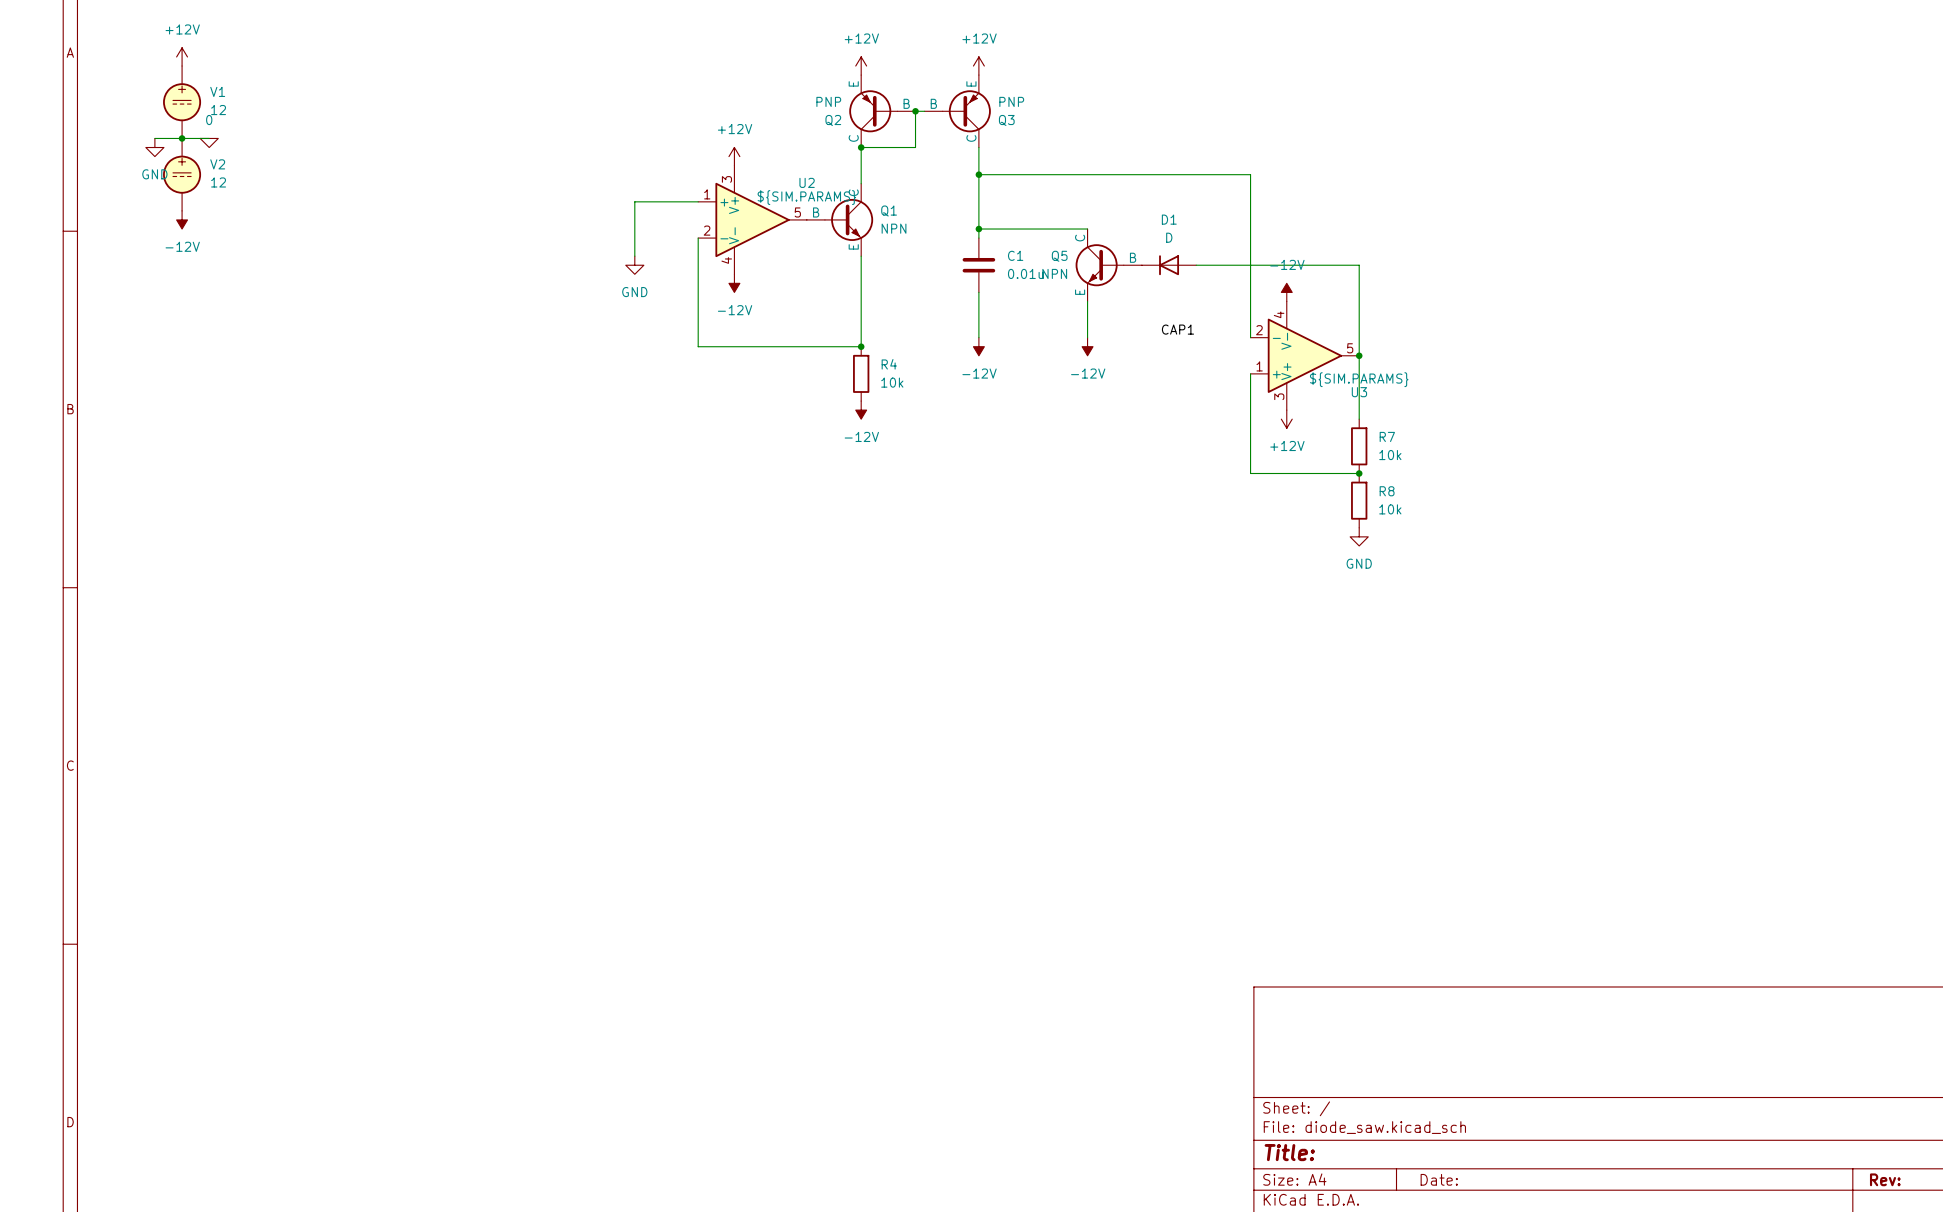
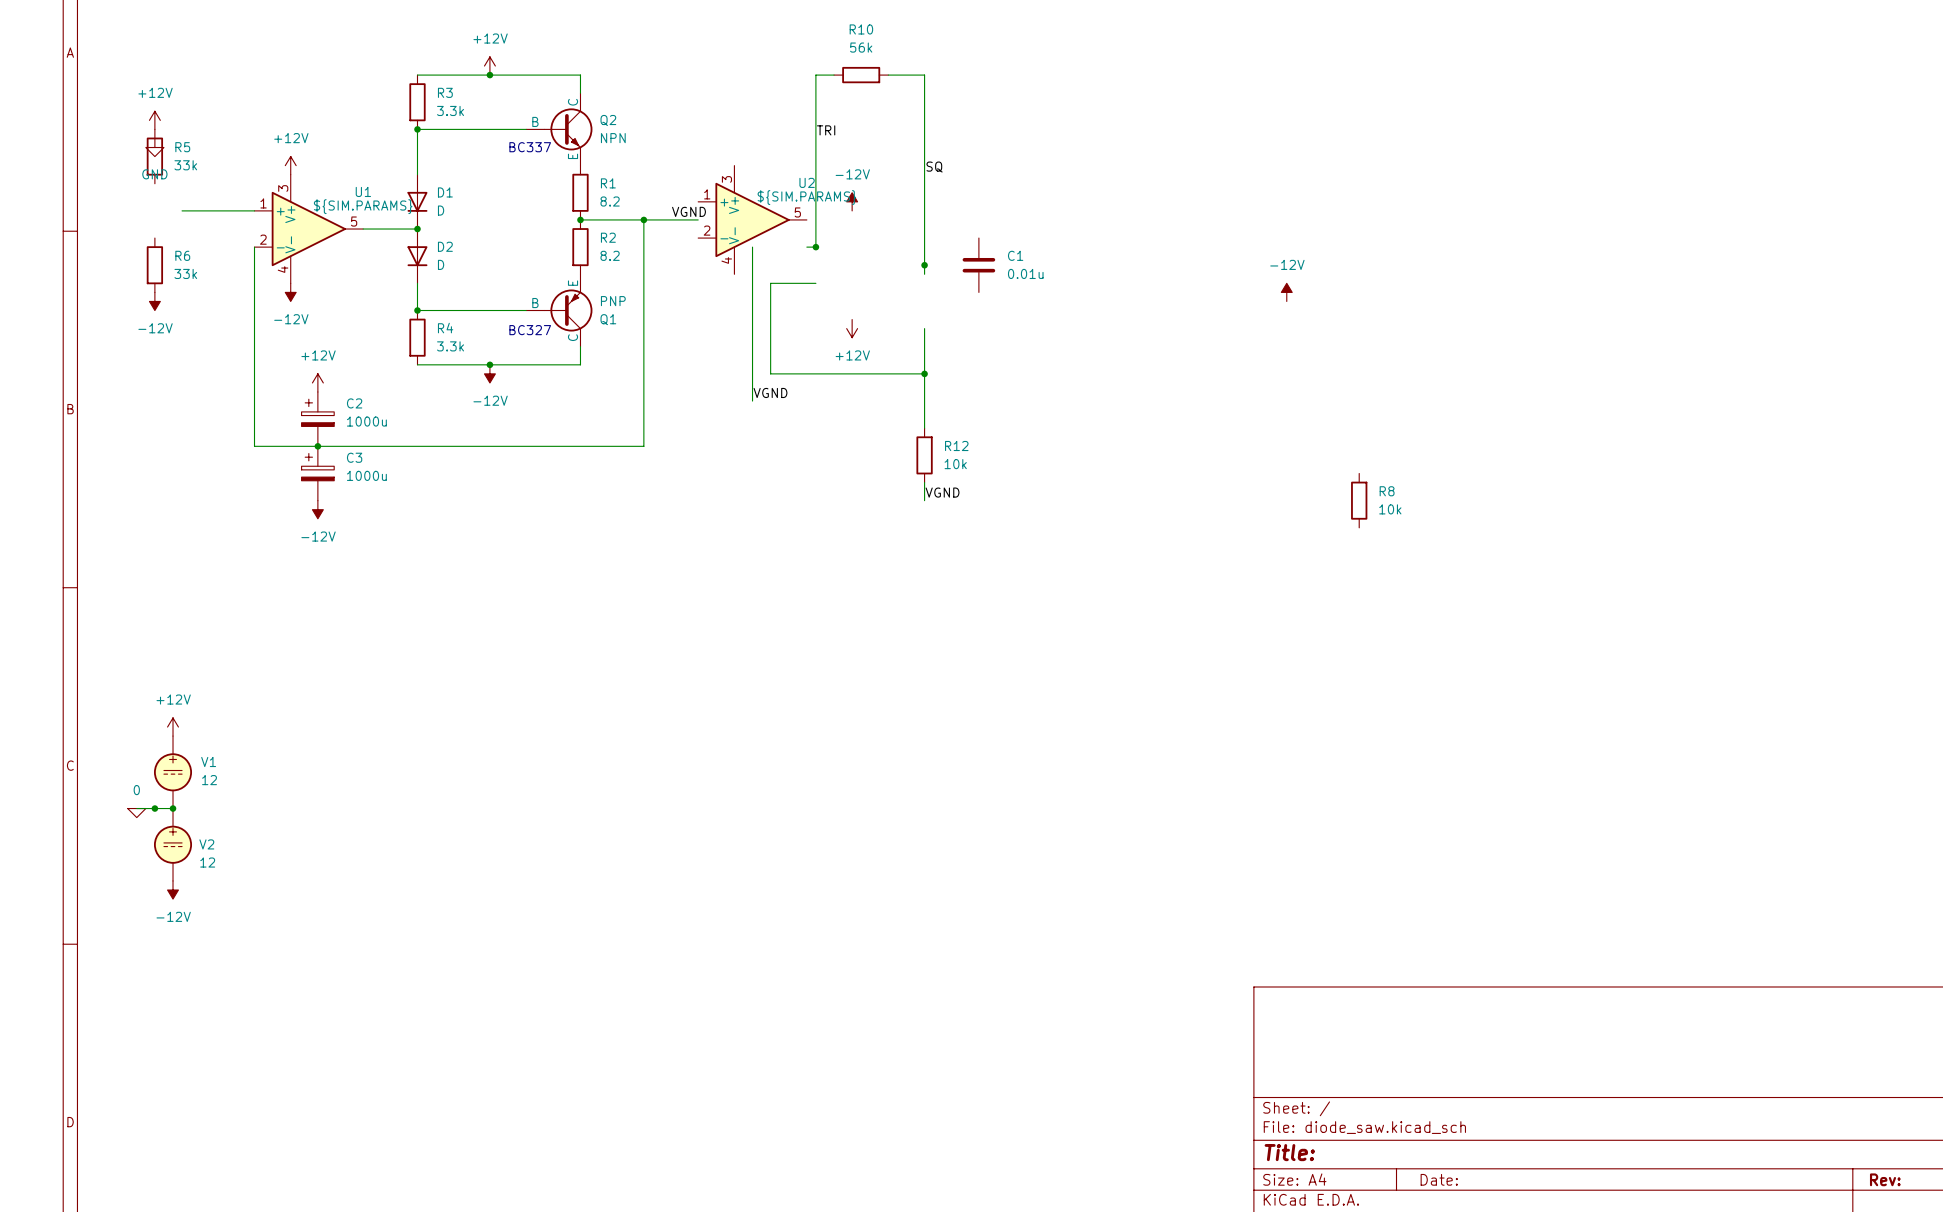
power symbol position: +12V (182, 56) -> +12V (154, 120)
power symbol: none -> +12V (489, 66)
power symbol: +12V (861, 66) -> none
power symbol: +12V (978, 66) -> none
wire: none -> (417, 75) (580, 75) (580, 93)
junction: none -> (489, 75)
wire: none -> (834, 75) (815, 75) (815, 247) (806, 247)
Q2 symbol: [849, 75, 916, 148] -> [526, 93, 593, 166]
R10: none -> 56k (861, 75)
wire: none -> (888, 75) (924, 75) (924, 274)
Q2 value: PNP (828, 101) -> NPN (613, 138)
V1 position: (182, 102) -> (173, 772)
R3: none -> 3.3k (417, 102)
junction: (915, 111) -> none
wire: (924, 111) (915, 111) (915, 147) (861, 147) (861, 183) -> none
Q3: PNP (957, 111) -> none
Q2 name position: Q2 (833, 120) -> Q2 (608, 120)
junction: none -> (417, 129)
wire: none -> (526, 129) (417, 129) (417, 174)
label: none -> TRI (826, 130)
wire: (154, 138) (209, 138) -> none
junction: (182, 138) -> none
power symbol: 0 (209, 142) -> none
text: none -> BC337 (530, 147)
junction: (861, 147) -> none
wire: (978, 147) (978, 238) -> none
R5: none -> 33k (154, 156)
power symbol: +12V (734, 156) -> none
V2 name position: V2 (217, 164) -> V2 (206, 844)
power symbol: none -> +12V (290, 165)
label: none -> SQ (934, 167)
V2 position: (182, 174) -> (173, 844)
wire: (978, 174) (1250, 174) (1250, 337) -> none
junction: (978, 174) -> none
V2 value position: 12 (218, 182) -> 12 (207, 862)
Q1 symbol: [806, 183, 874, 257] -> [526, 274, 593, 347]
R1: none -> 8.2 (580, 192)
wire: (698, 201) (634, 201) (634, 256) -> none
power symbol: none -> -12V (852, 201)
wire: none -> (182, 210) (254, 210)
Q1 name position: Q1 (889, 210) -> Q1 (608, 319)
label: none -> VGND (688, 211)
power symbol: -12V (182, 219) -> none
wire: none -> (580, 219) (698, 219)
junction: none -> (580, 219)
wire: none -> (643, 219) (643, 446) (254, 446) (254, 247)
junction: none -> (643, 219)
D1 name position: D1 (1169, 219) -> D1 (445, 192)
Q1 value: NPN (894, 228) -> PNP (613, 301)
U1: none -> ${SIM.PARAMS} (308, 229)
wire: none -> (363, 229) (417, 229)
junction: none -> (417, 229)
wire: (978, 229) (1087, 229) -> none
junction: (978, 229) -> none
D1 value position: D (1169, 237) -> D (441, 210)
wire: (698, 238) (698, 346) (861, 346) (861, 256) -> none
R2: none -> 8.2 (580, 247)
wire: none -> (752, 247) (752, 401)
junction: none -> (815, 247)
D2: none -> D (417, 256)
R6: none -> 33k (154, 265)
power symbol: GND (634, 265) -> none
junction: none -> (924, 265)
Q5: NPN (1108, 265) -> none
D1 rotation: 0° (1169, 265) -> 90° counterclockwise (417, 201)
D1 position: (1169, 265) -> (417, 201)
wire: (1196, 265) (1359, 265) (1359, 419) -> none
wire: none -> (417, 283) (417, 310) (526, 310)
power symbol: -12V (734, 283) -> none
wire: none -> (815, 283) (770, 283) (770, 373) (924, 373)
power symbol: none -> -12V (290, 292)
wire: (978, 292) (978, 337) -> none
power symbol: none -> -12V (154, 301)
wire: (1087, 301) (1087, 337) -> none
junction: none -> (417, 310)
power symbol: none -> +12V (852, 328)
wire: none -> (924, 328) (924, 428)
label: CAP1 (1177, 329) -> none
text: none -> BC327 (530, 330)
wire: none -> (580, 346) (580, 364) (417, 364)
junction: (861, 346) -> none
power symbol: -12V (978, 346) -> none
power symbol: -12V (1087, 346) -> none
U3: ${SIM.PARAMS} (1304, 355) -> none
junction: (1359, 355) -> none
junction: none -> (489, 364)
power symbol: none -> -12V (489, 373)
R4 position: (861, 373) -> (417, 337)
junction: none -> (924, 373)
wire: (1250, 373) (1250, 473) (1359, 473) -> none
power symbol: none -> +12V (317, 382)
R4 value: 10k (892, 382) -> 3.3k (450, 346)
label: none -> VGND (770, 392)
power symbol: -12V (861, 410) -> none
C2: none -> 1000u (317, 419)
power symbol: +12V (1286, 419) -> none
junction: none -> (317, 446)
R7: 10k (1359, 446) -> none
R12: none -> 10k (924, 455)
C3: none -> 1000u (317, 473)
junction: (1359, 473) -> none
wire: none -> (924, 482) (924, 500)
label: none -> VGND (942, 492)
power symbol: none -> -12V (317, 509)
power symbol: GND (1359, 536) -> none
power symbol: none -> +12V (173, 727)
wire: none -> (136, 808) (173, 808)
junction: none -> (154, 808)
junction: none -> (173, 808)
power symbol: none -> 0 (136, 813)
power symbol: none -> -12V (173, 890)

